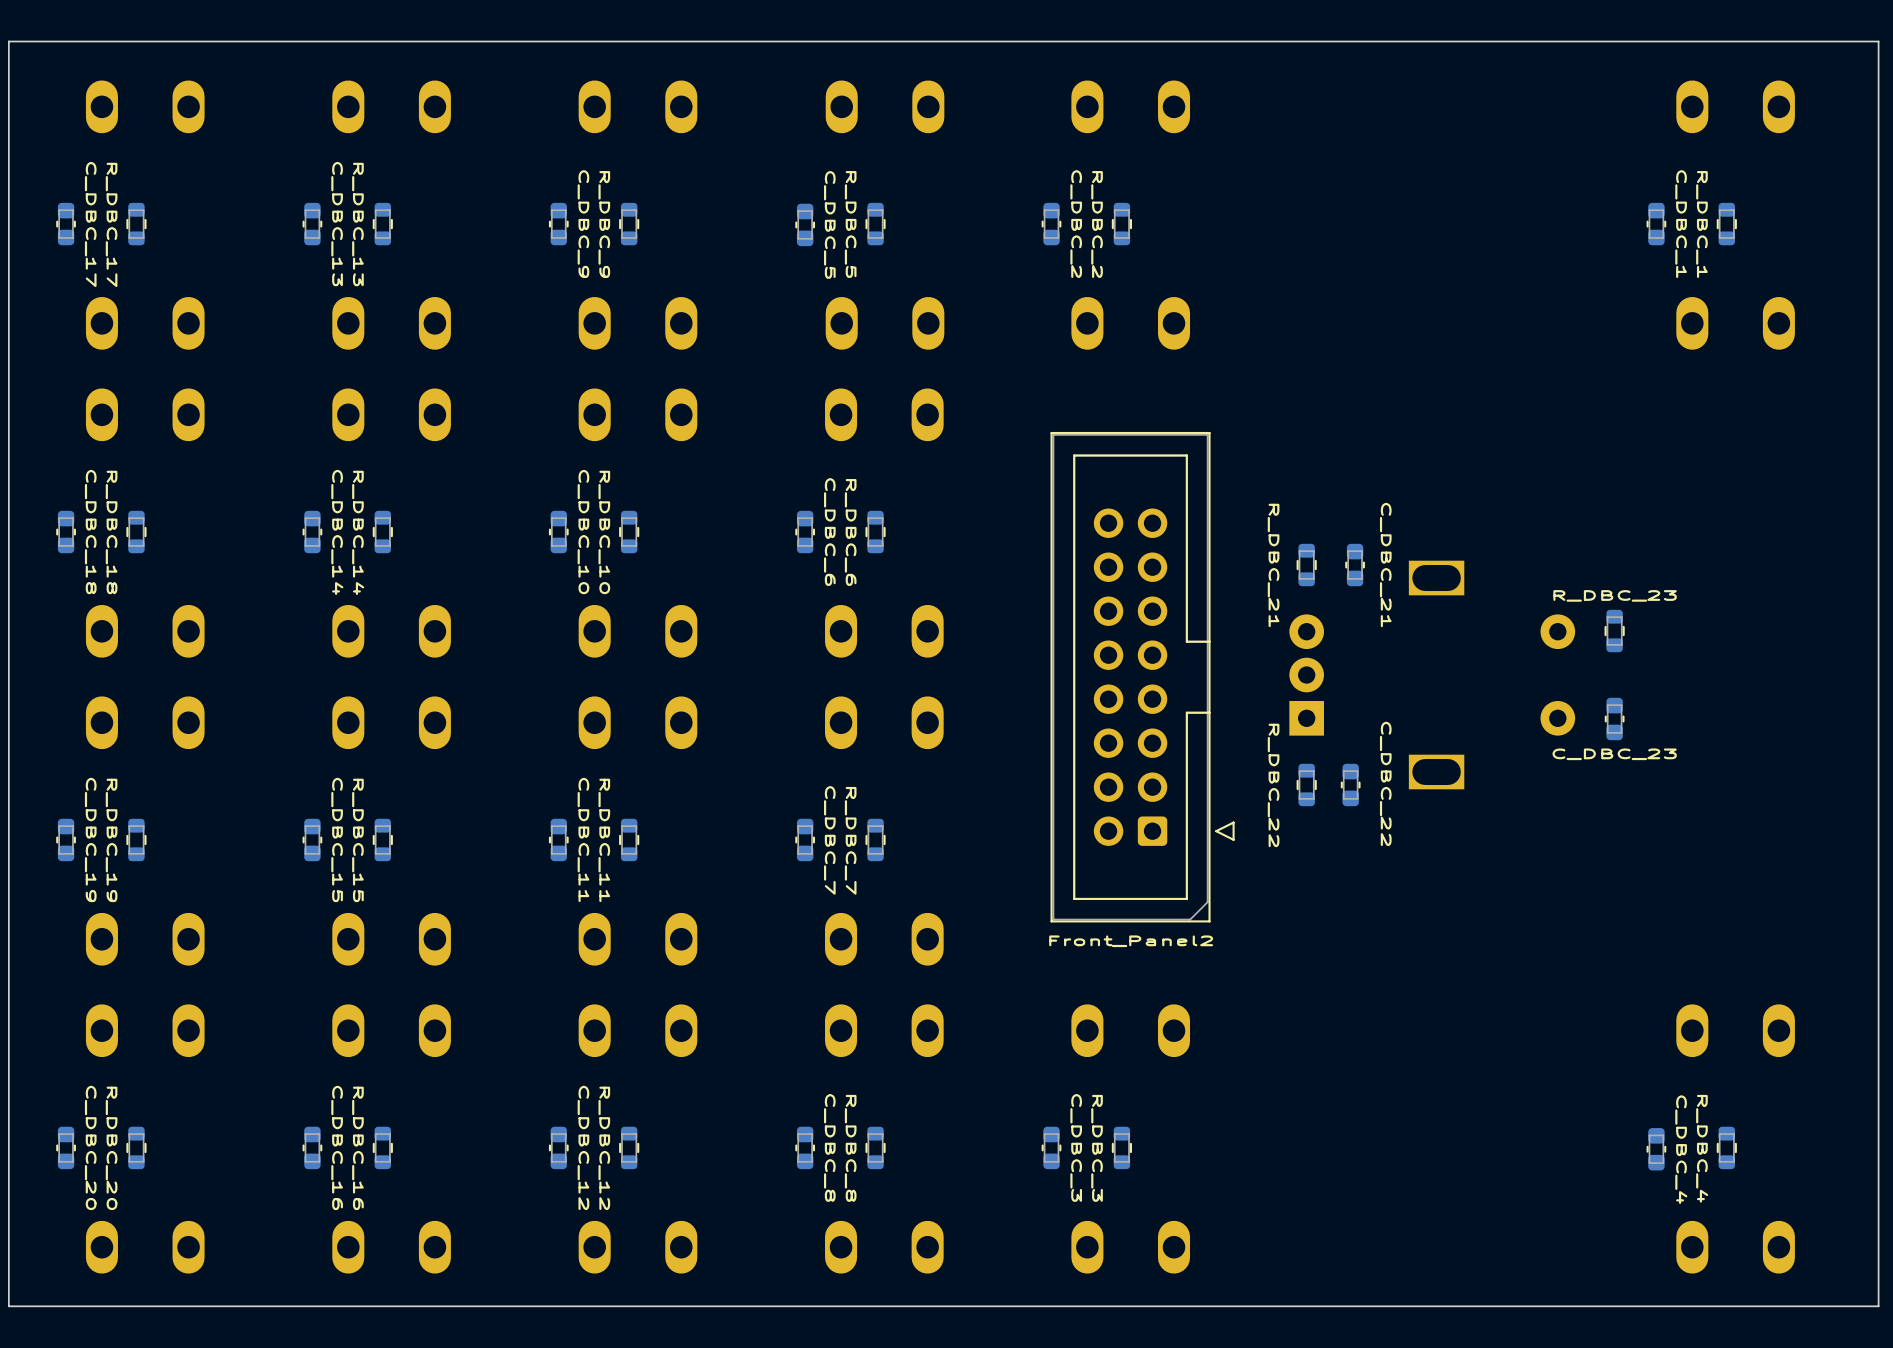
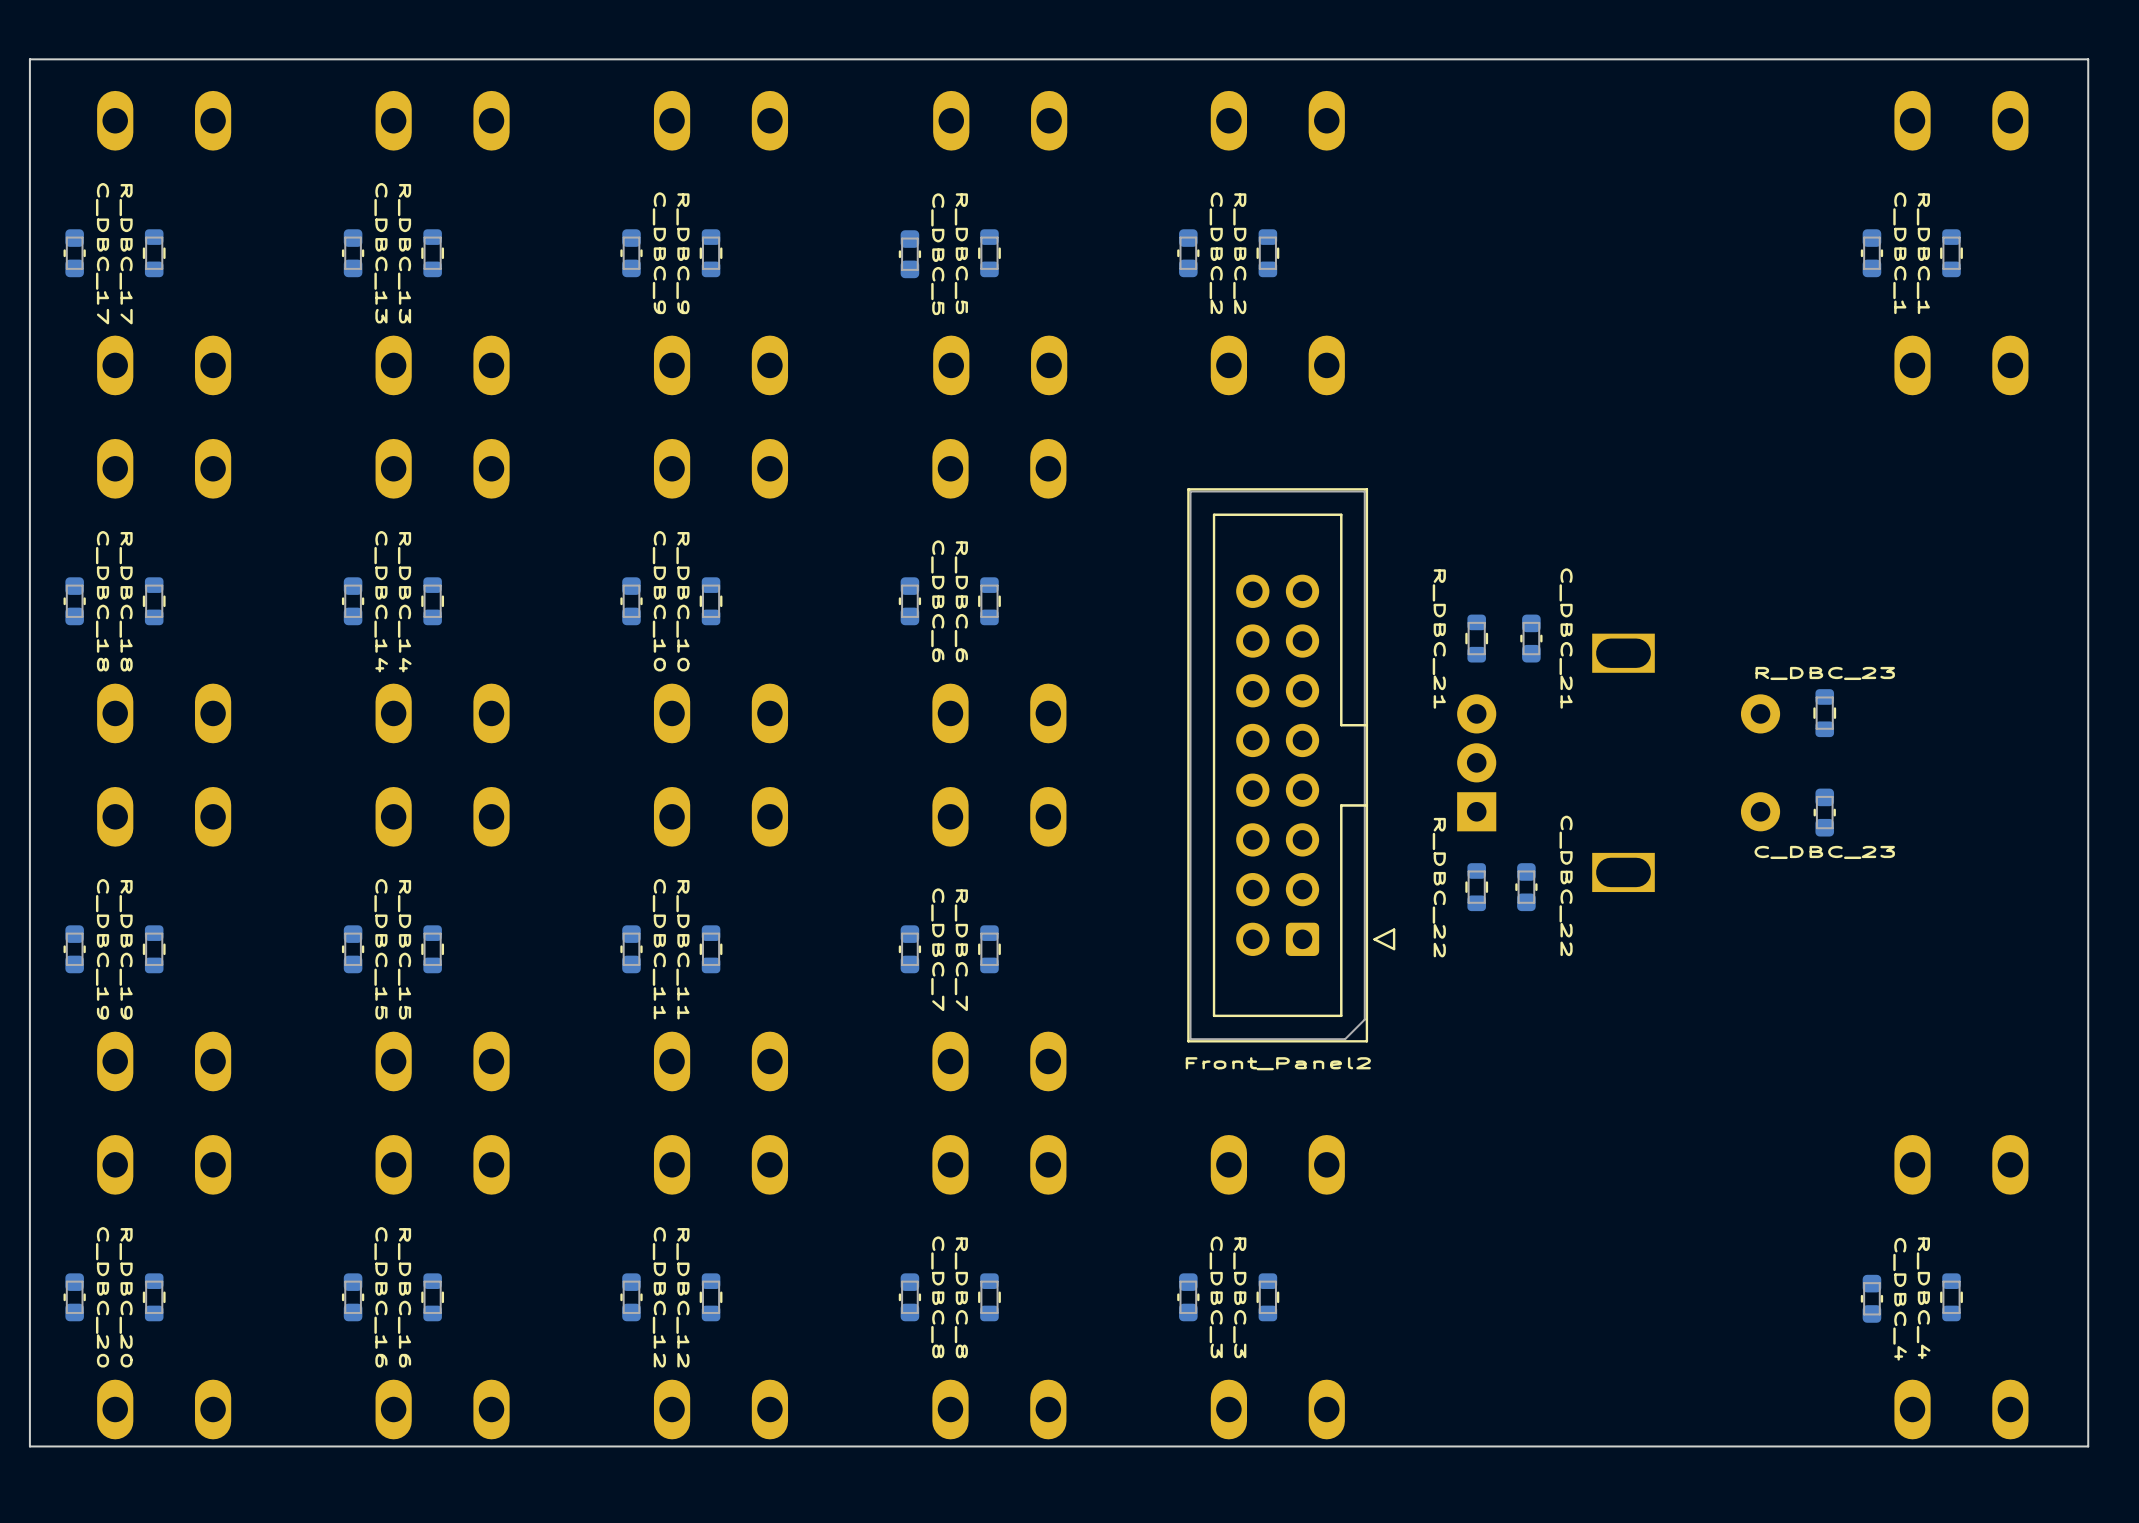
board edge: (1878, 41) (8, 41) (8, 1306) (1878, 1306) (1878, 41) -> (2088, 59) (2088, 1446) (29, 1446) (29, 59) (2088, 59)

